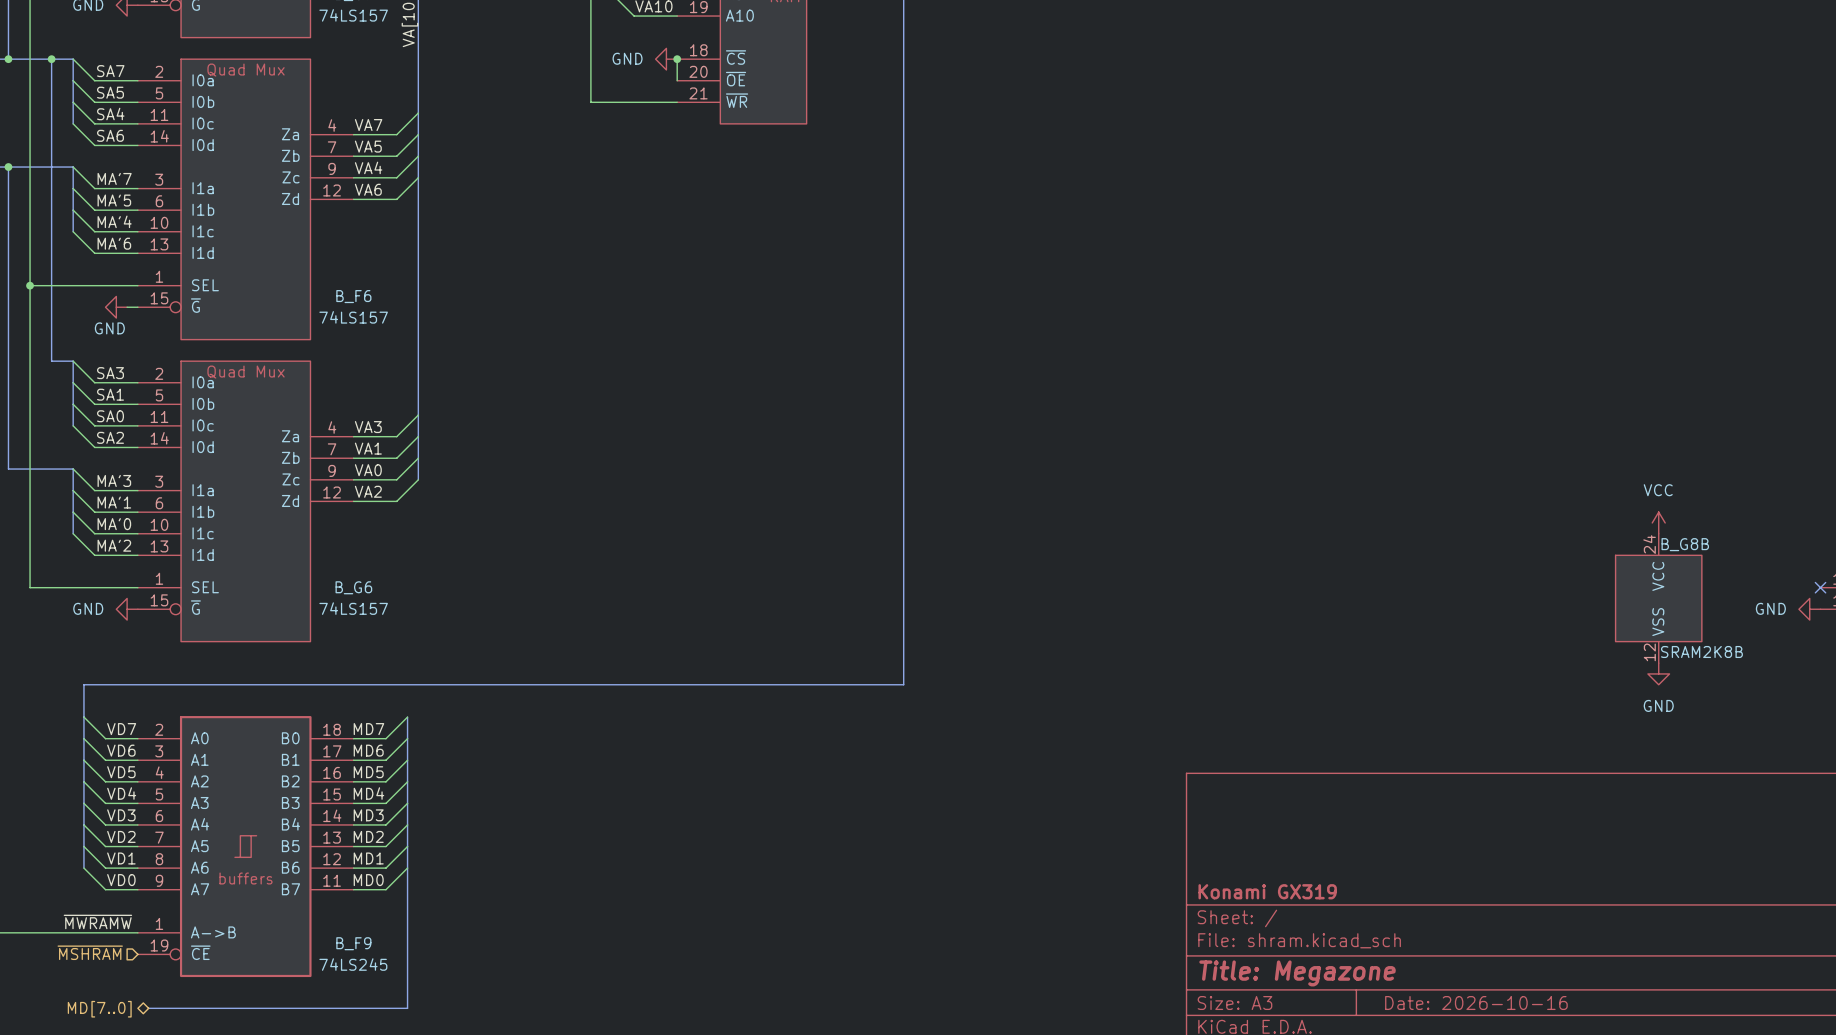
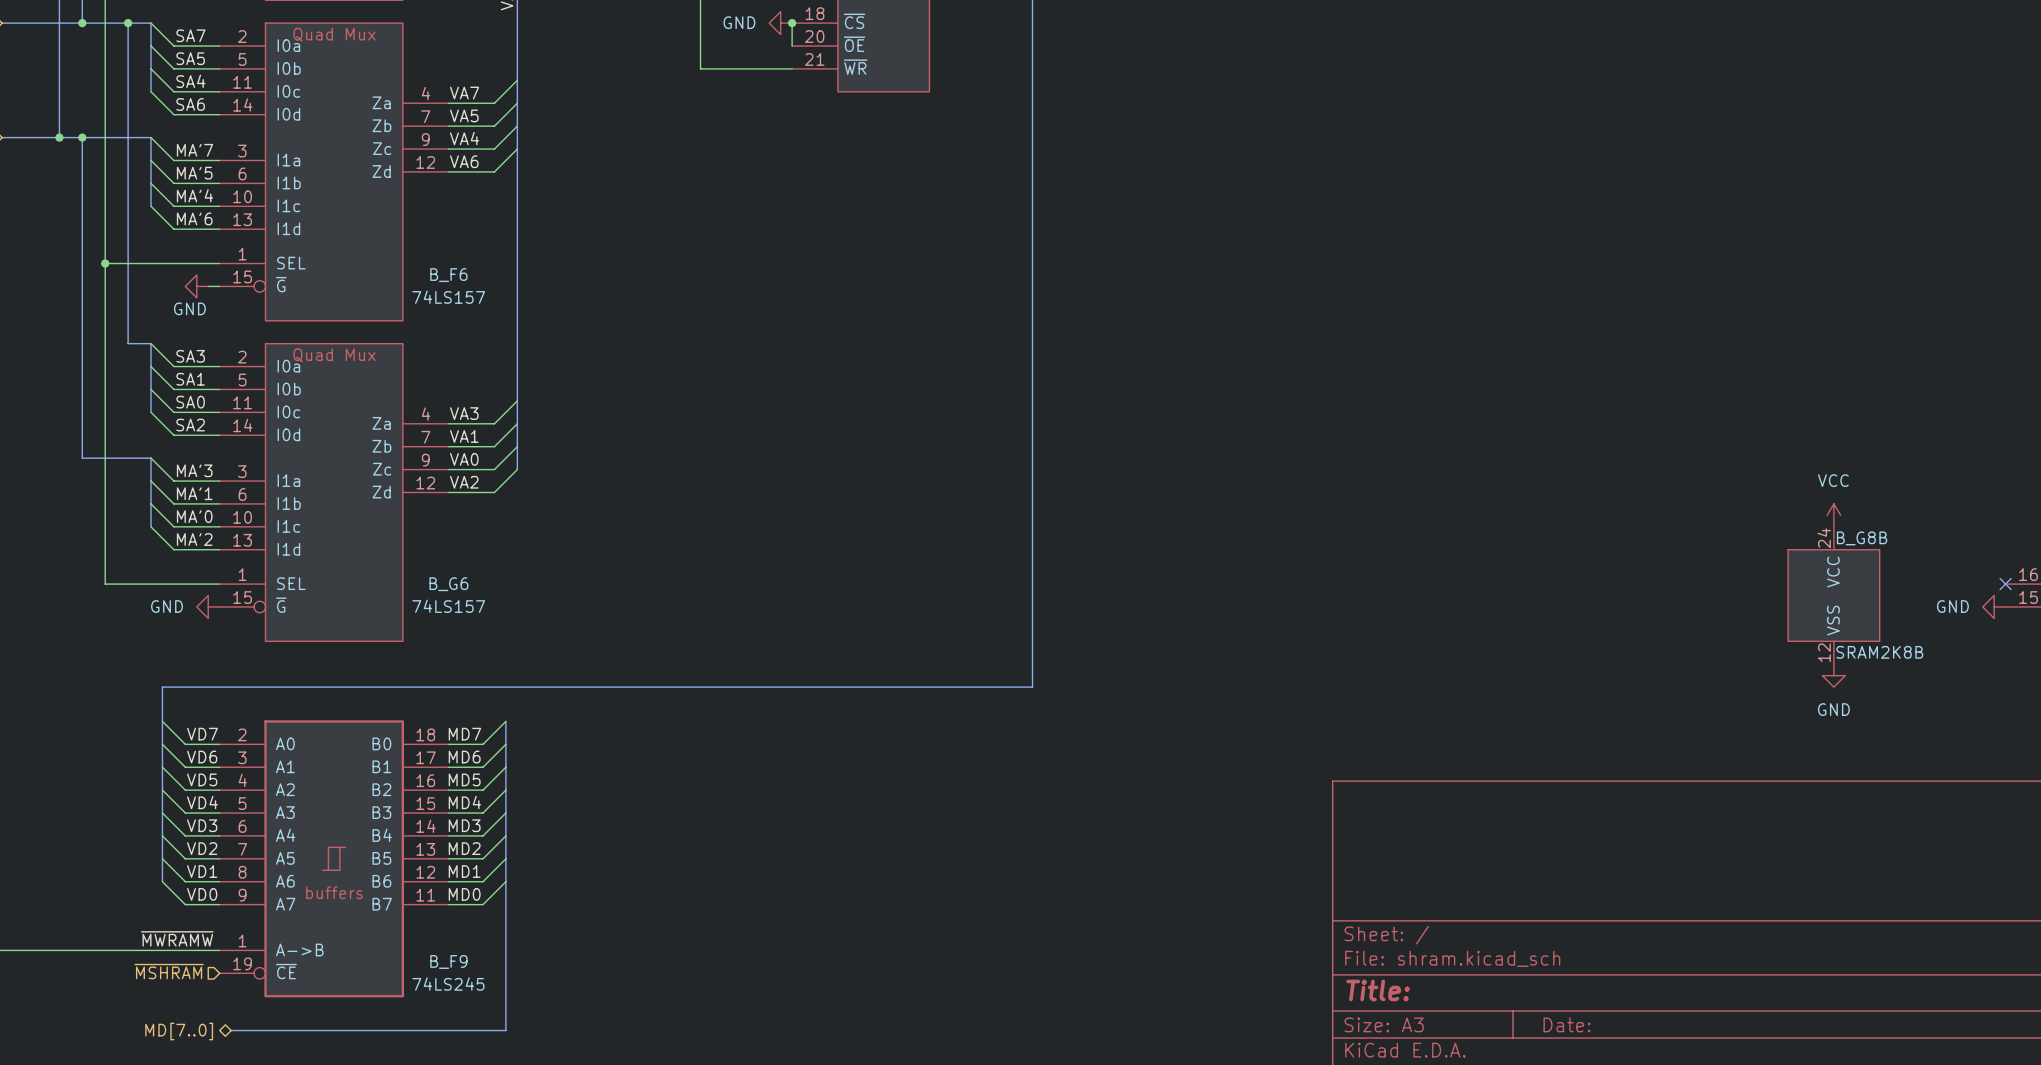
title block: Konami GX319 (1267, 891) -> none
title block: Title: Megazone (1297, 973) -> Title: (1378, 990)
title block: Date: 2026-10-16 (1476, 1003) -> Date: (1567, 1024)

